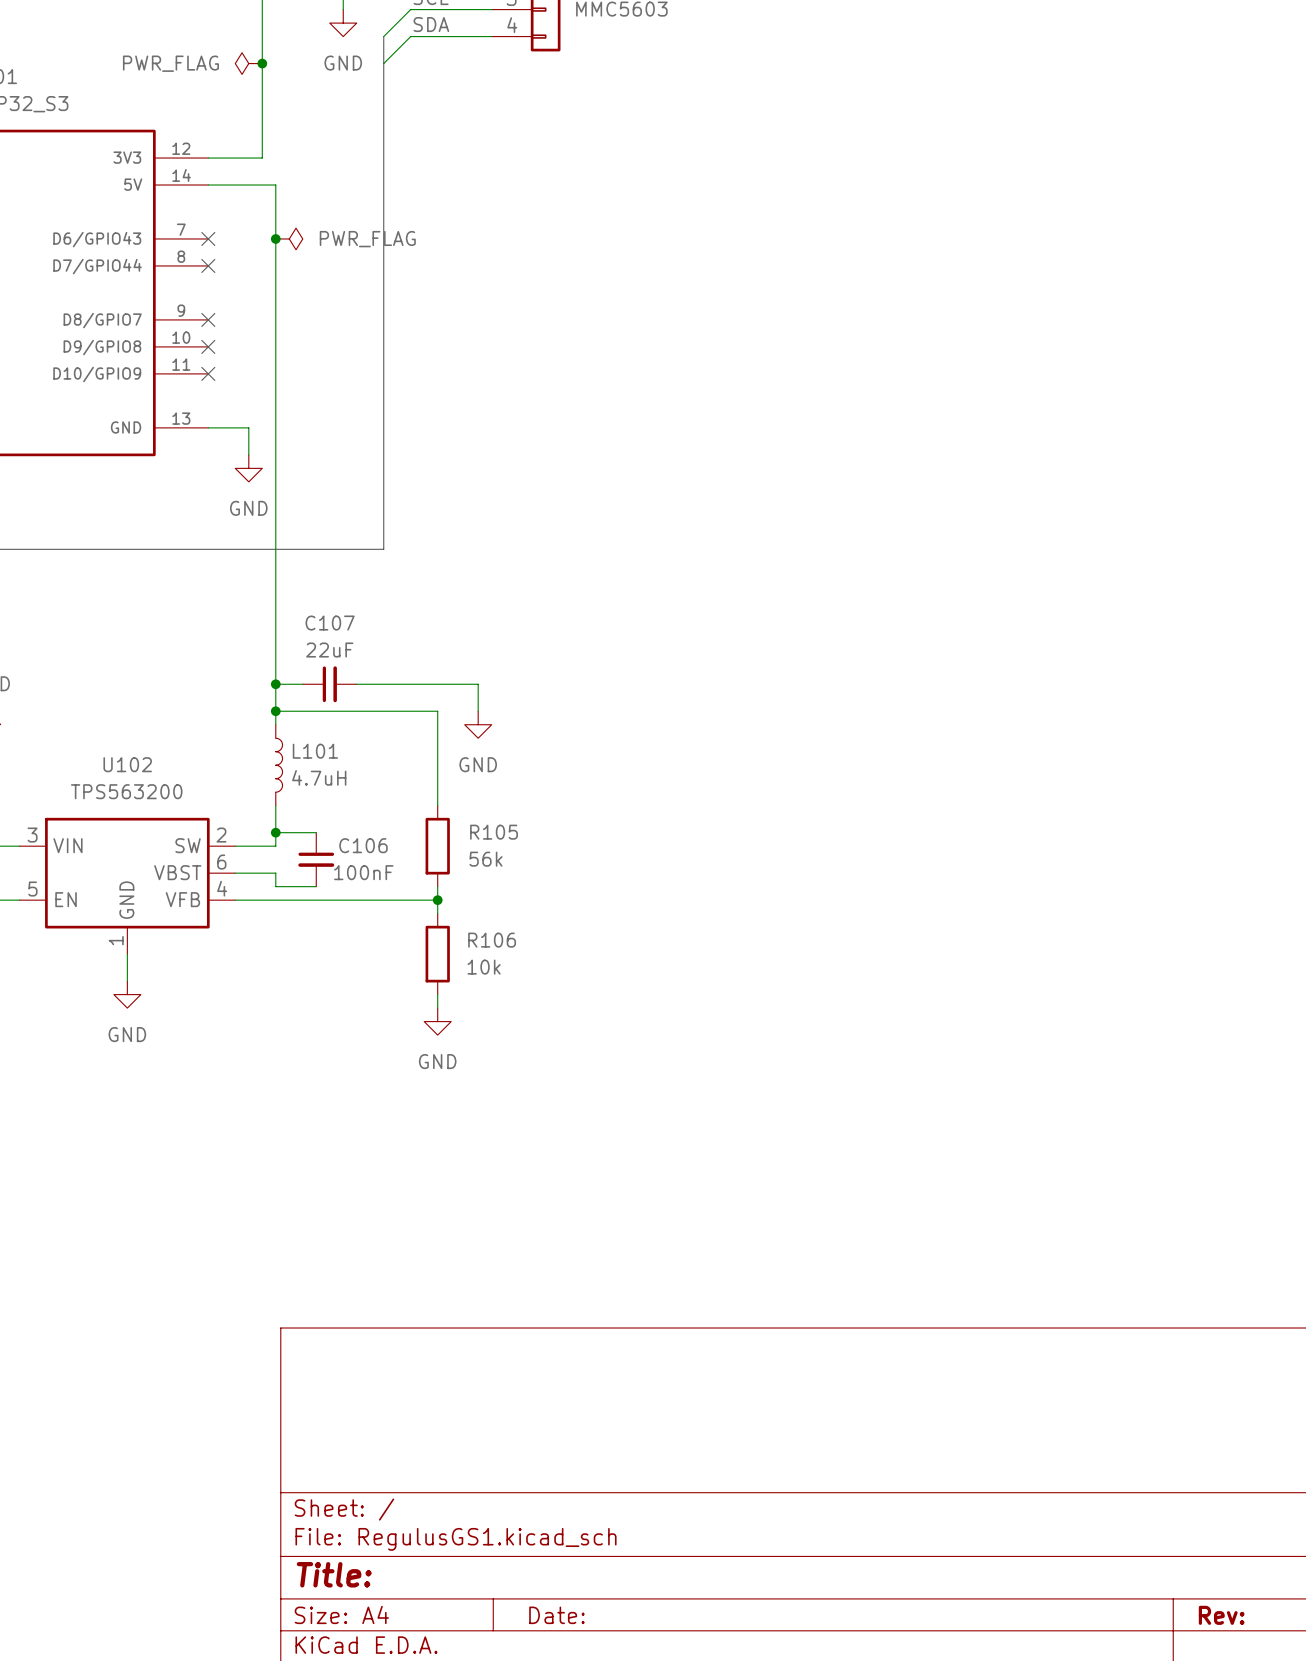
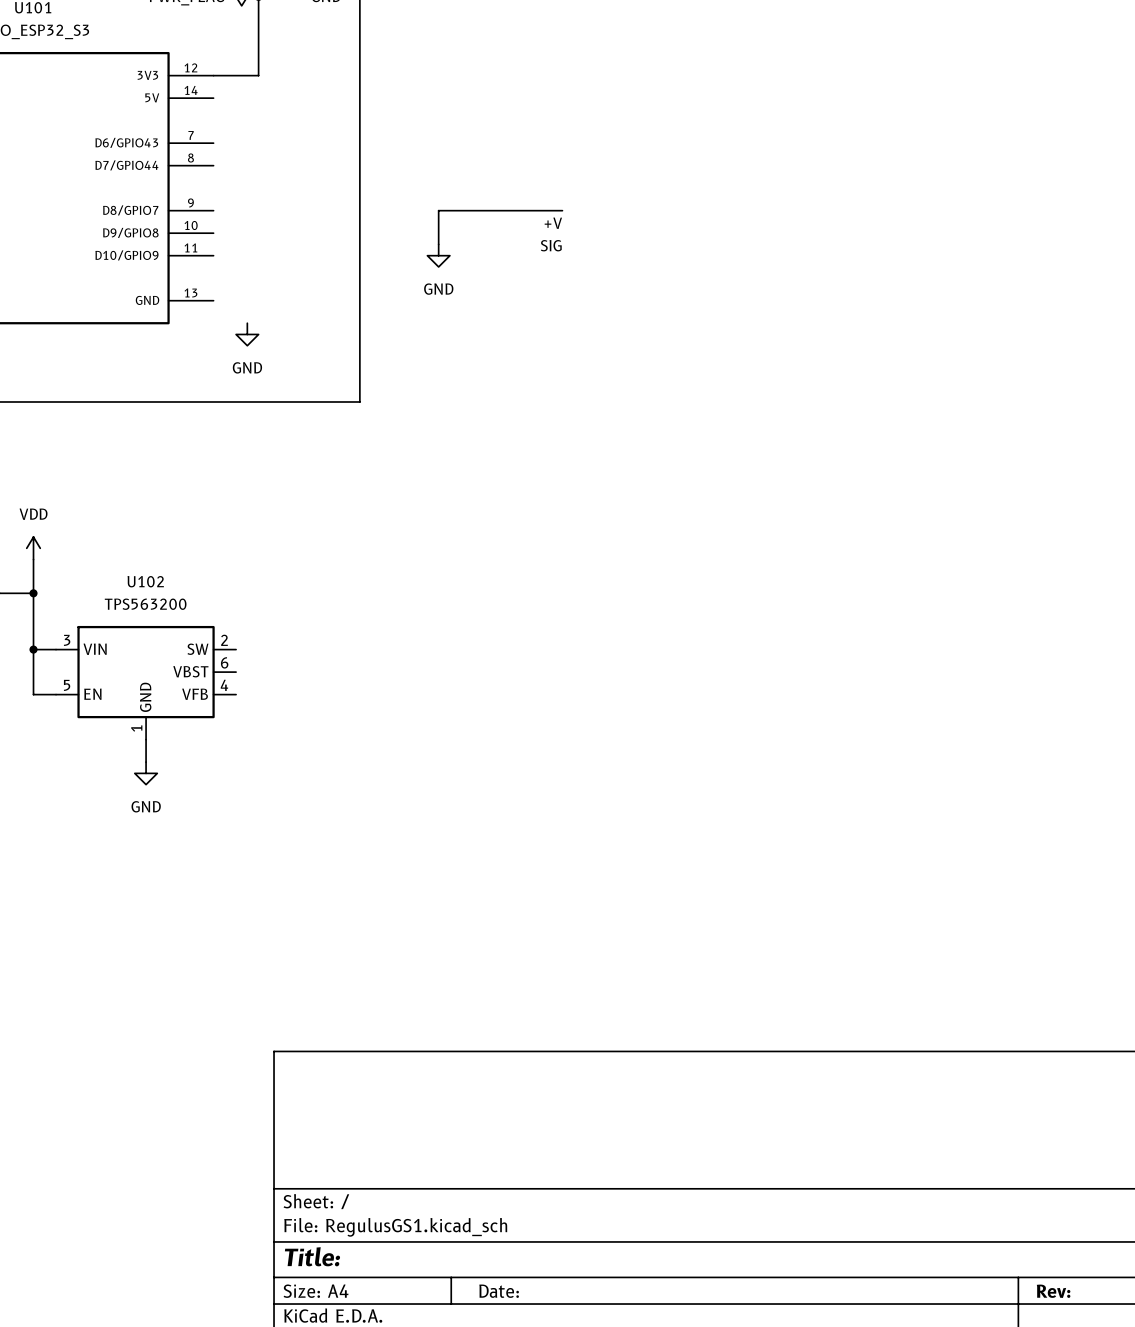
wire: (208, 185) (275, 185) (275, 724) -> none
no-connect mark: (208, 238) -> none
junction: (275, 238) -> none
power symbol: PWR_FLAG (289, 238) -> none
no-connect mark: (208, 265) -> none
no-connect mark: (208, 319) -> none
wire: none -> (562, 210) (438, 210) (438, 244)
label: none -> +V (553, 223)
no-connect mark: (208, 346) -> none
label: none -> SIG (551, 245)
no-connect mark: (208, 373) -> none
power symbol: none -> GND (438, 255)
wire: (208, 427) (248, 427) (248, 454) -> none
wire: (275, 684) (302, 684) -> none
junction: (275, 684) -> none
C107: 22uF (329, 684) -> none
wire: (356, 684) (478, 684) (478, 711) -> none
wire: (275, 711) (437, 711) (437, 805) -> none
junction: (275, 711) -> none
power symbol: GND (478, 724) -> none
L101: 4.7uH (279, 765) -> none
wire: (275, 805) (275, 846) (235, 846) -> none
wire: (275, 832) (316, 832) -> none
junction: (275, 832) -> none
R105: 56k (437, 846) -> none
C106: 100nF (316, 859) -> none
wire: (235, 873) (275, 873) (275, 886) (316, 886) -> none
wire: (437, 886) (437, 913) -> none
wire: (235, 900) (437, 900) -> none
junction: (437, 900) -> none
R106: 10k (437, 954) -> none
wire: (437, 994) (437, 1008) -> none
power symbol: GND (437, 1021) -> none

